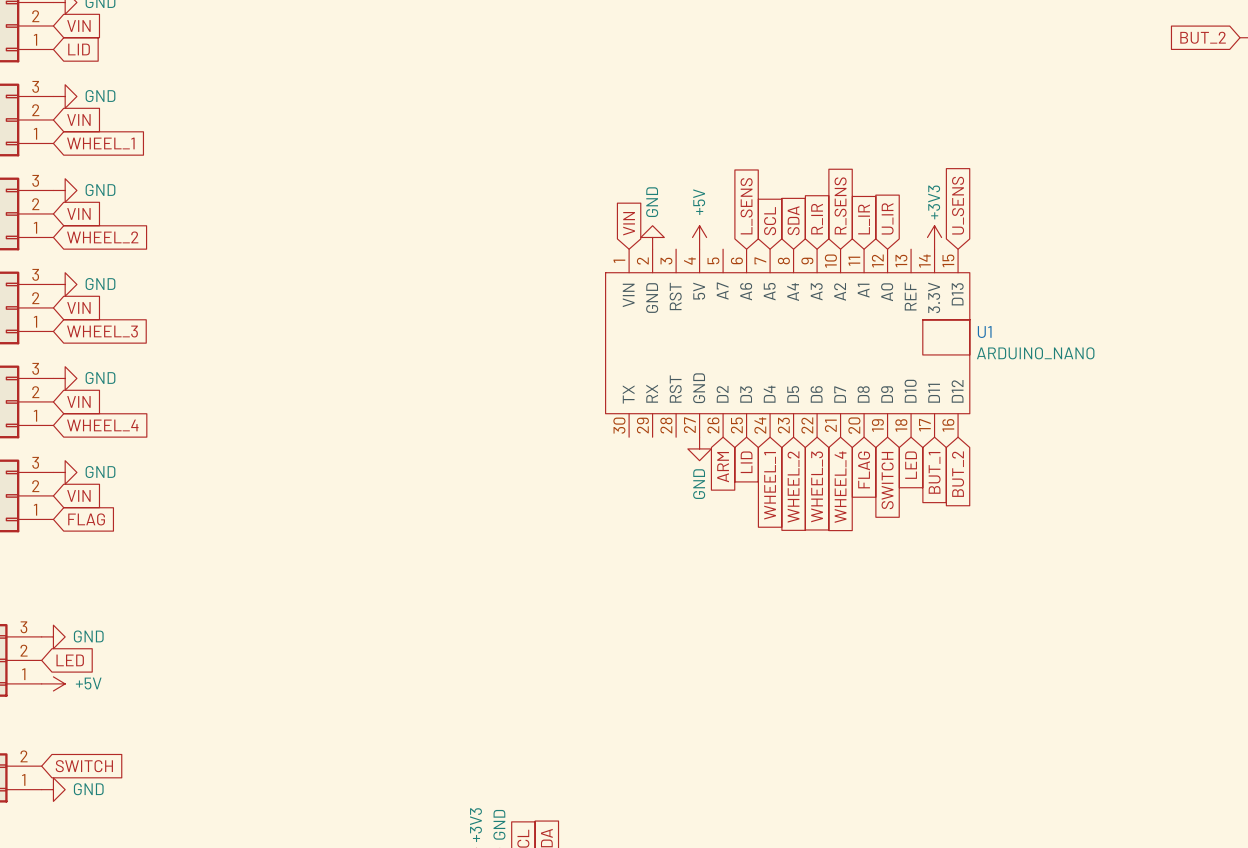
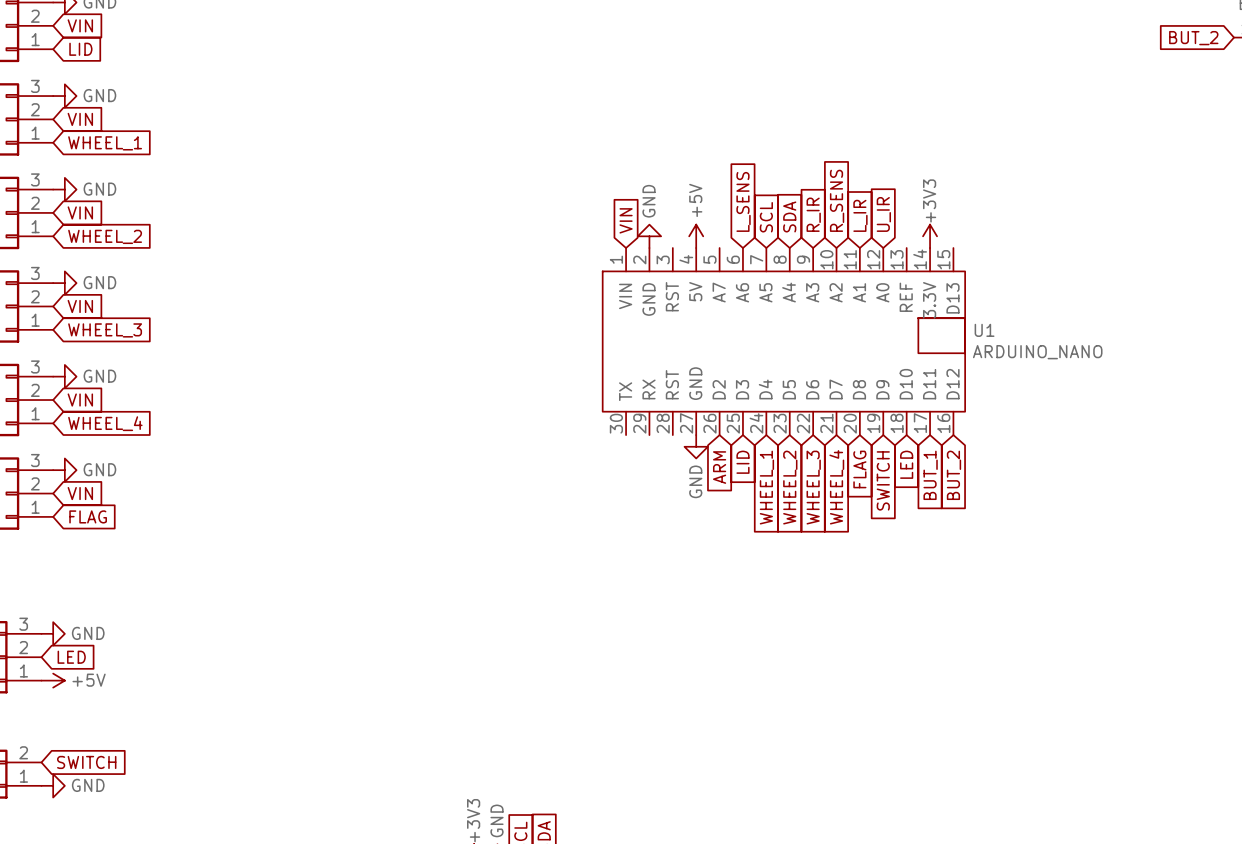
global label: U_SENS (958, 205) -> none

